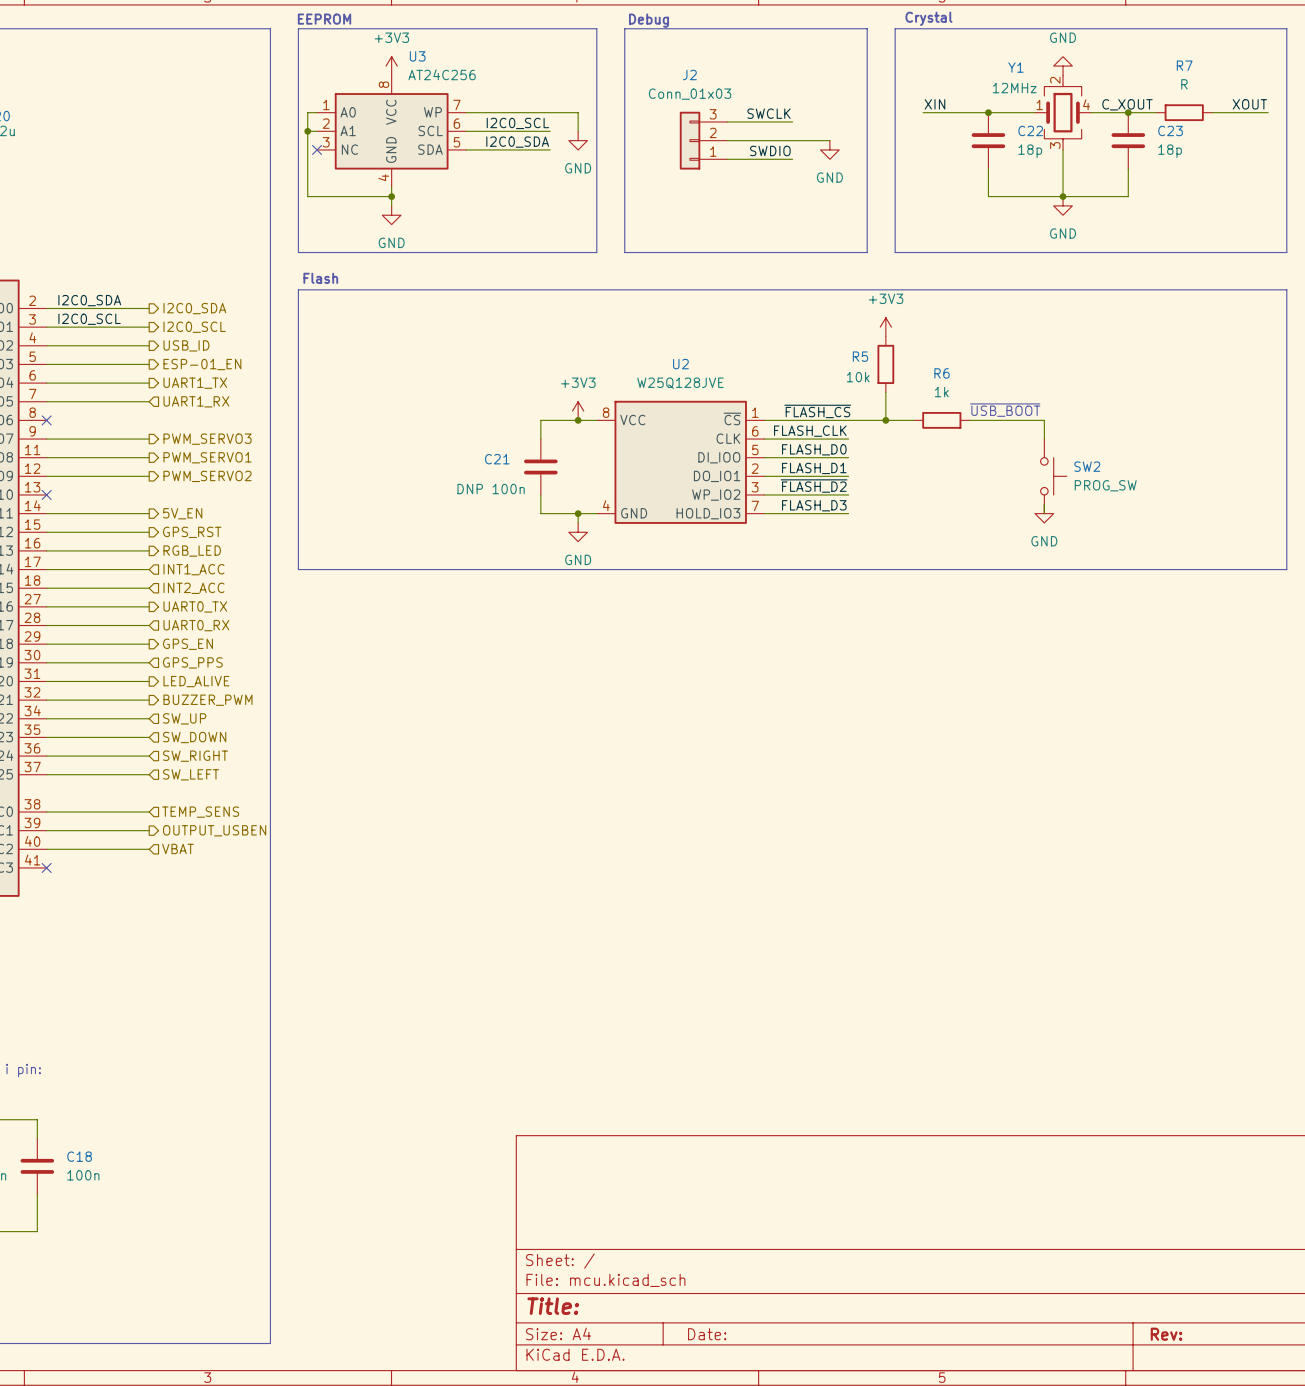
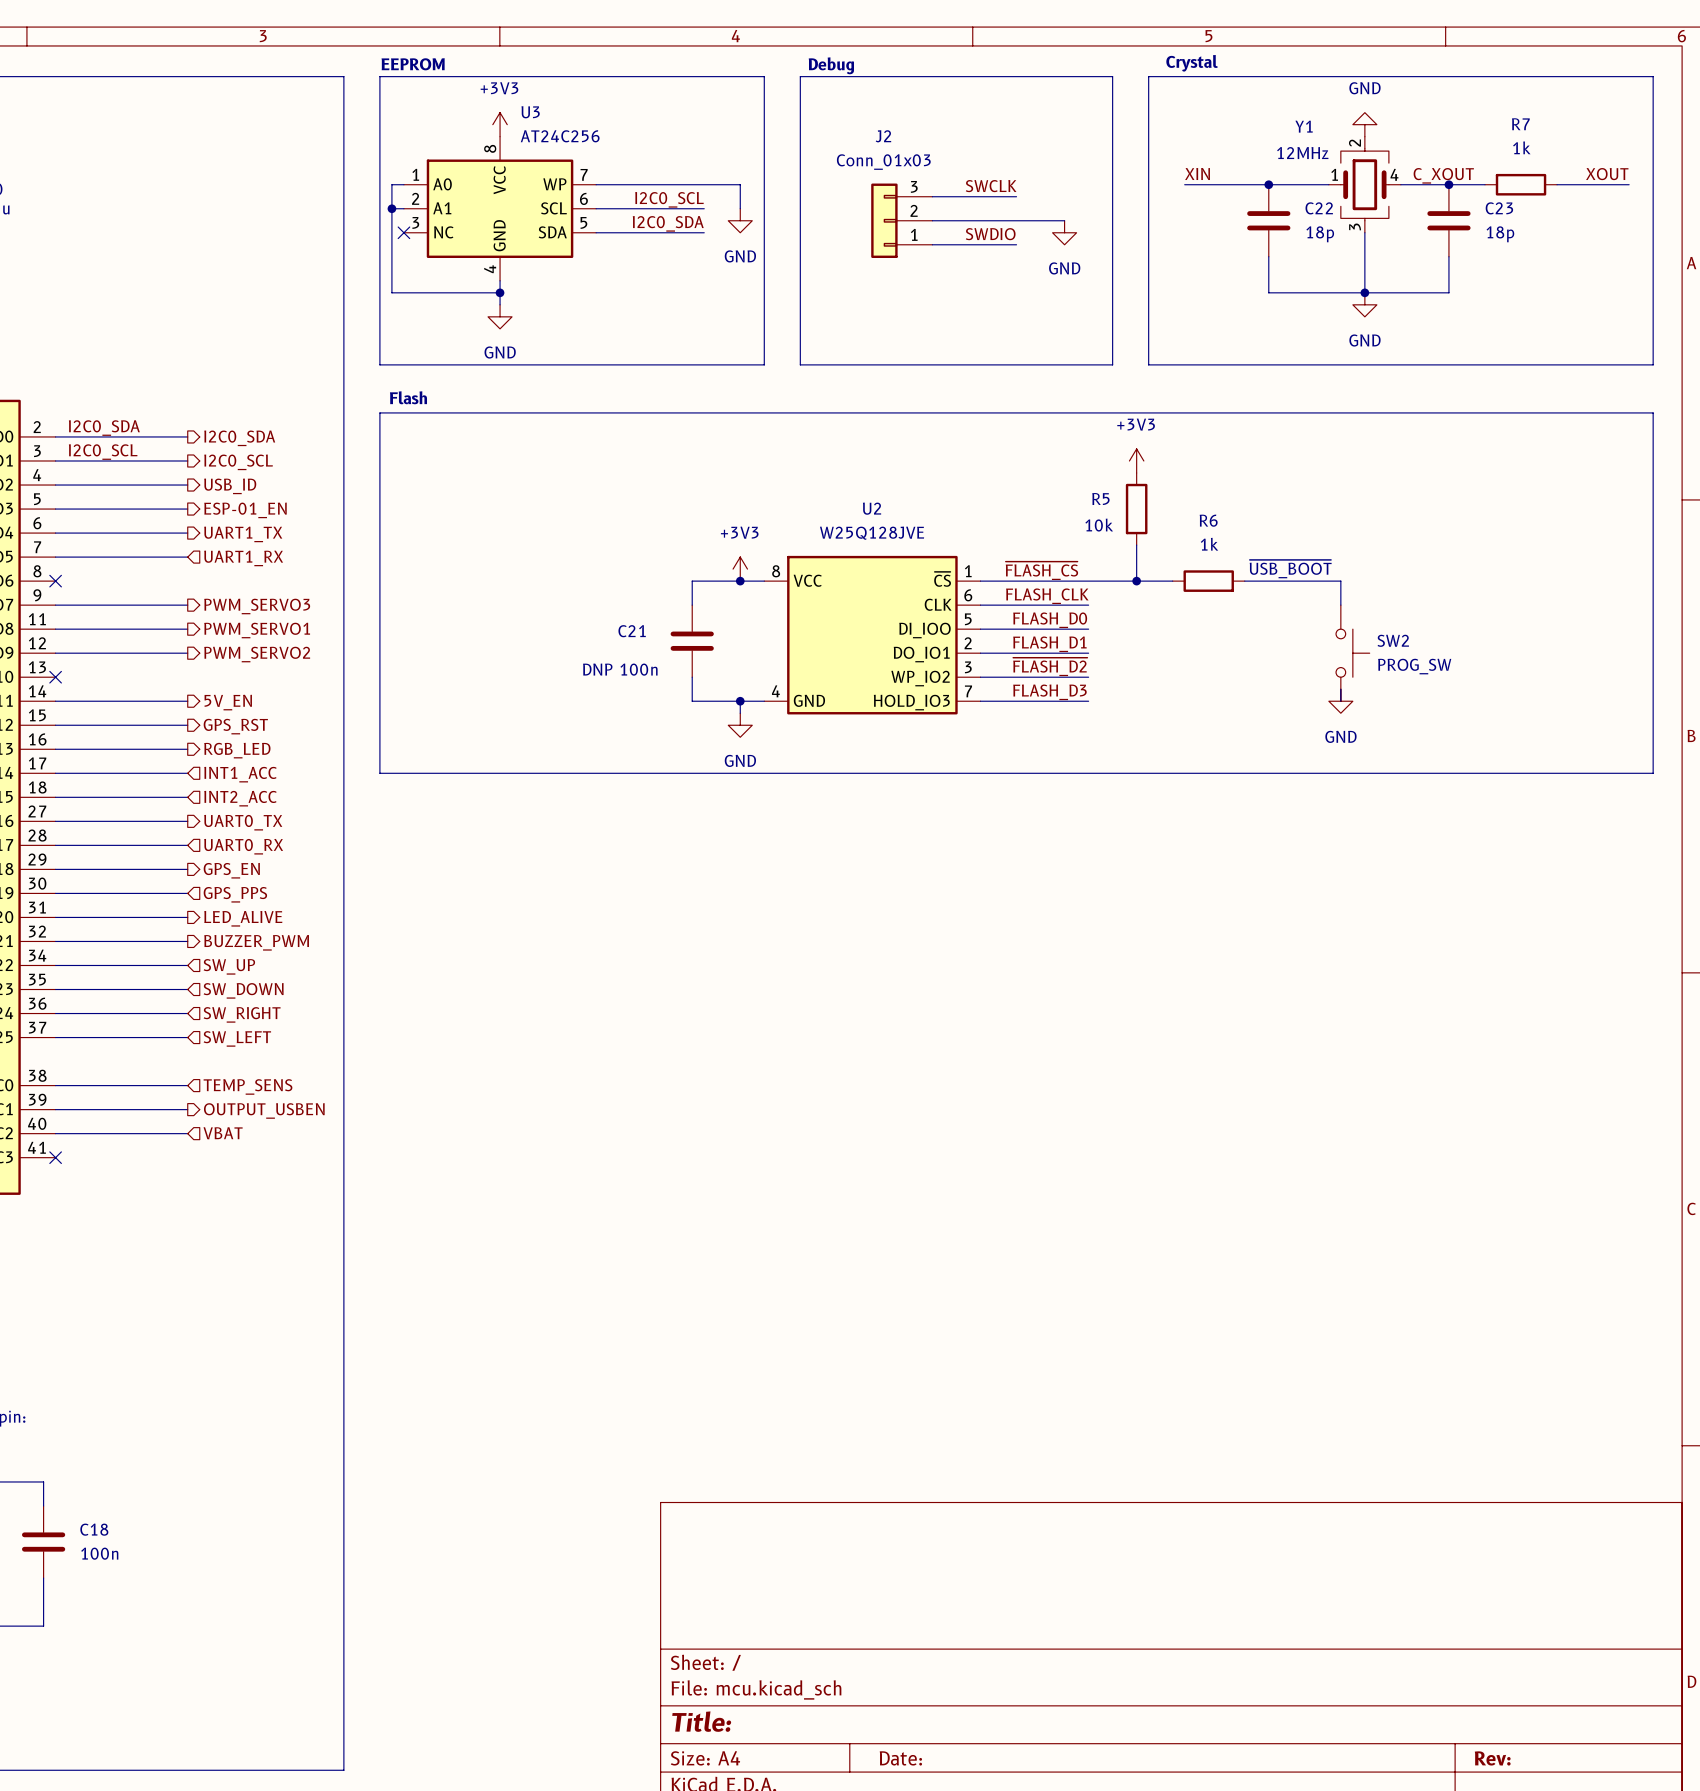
R7 value: R (1184, 84) -> 1k (1521, 147)

